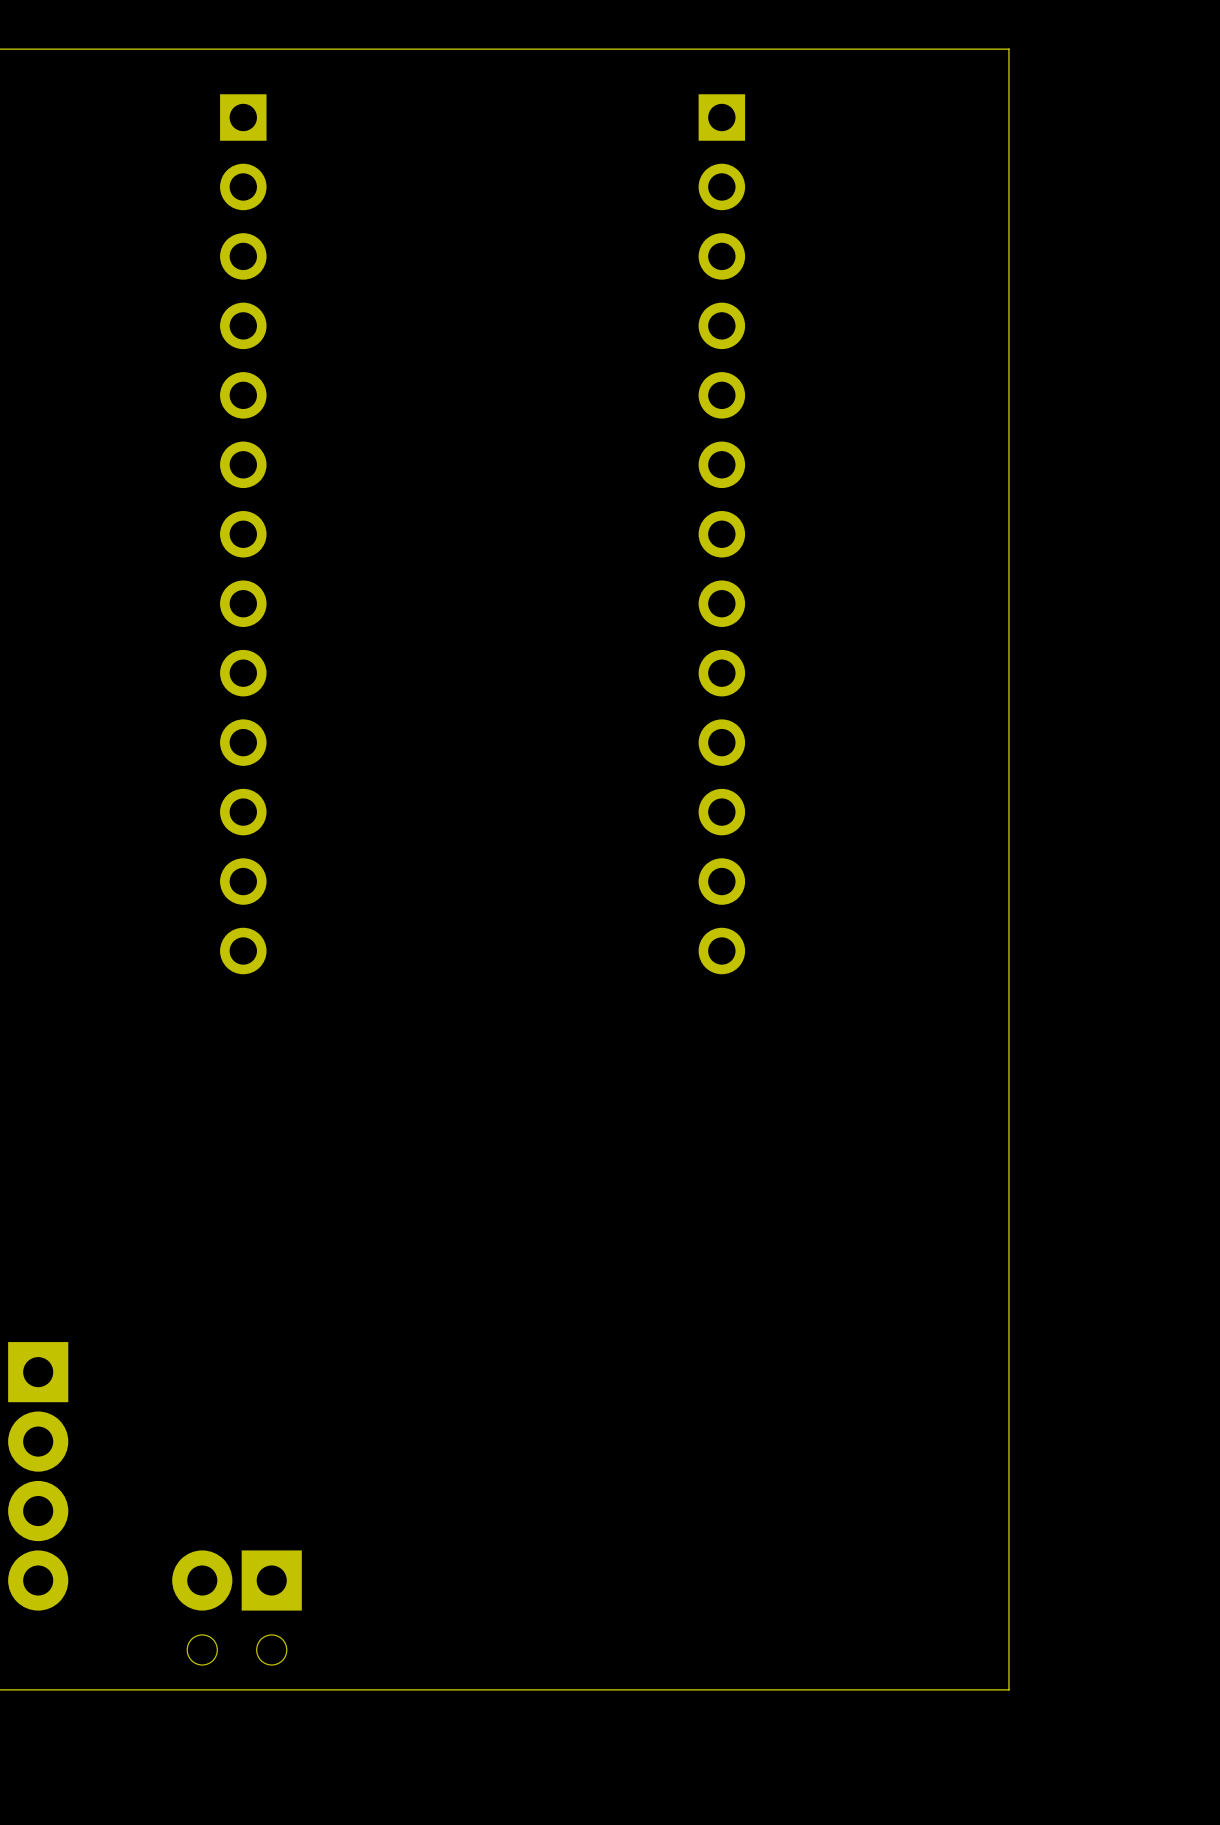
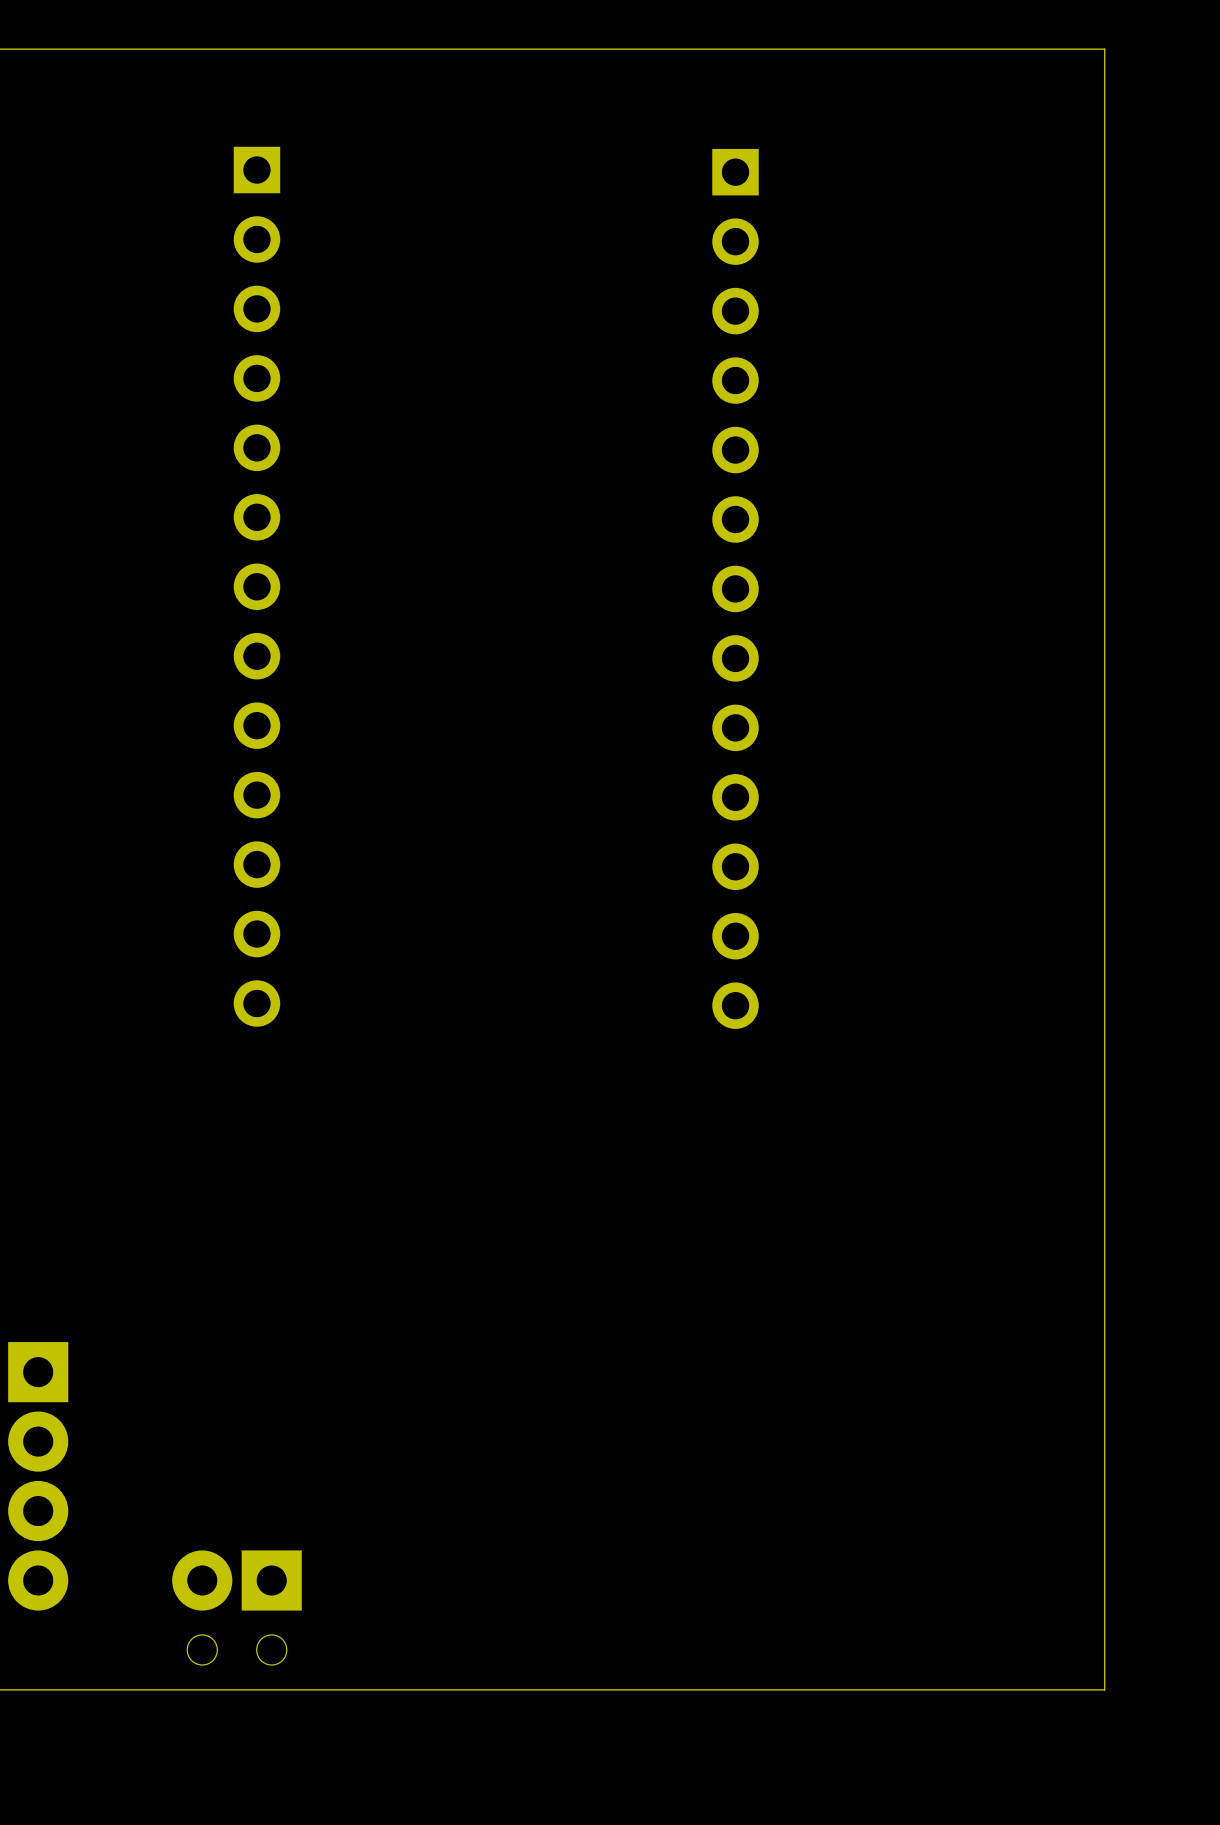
board edge: (1008, 49) (1008, 1689) -> (1008, 49) (1104, 49) (1104, 1689) (1008, 1689)
part position: (243, 534) -> (256, 586)
part position: (721, 534) -> (735, 588)

